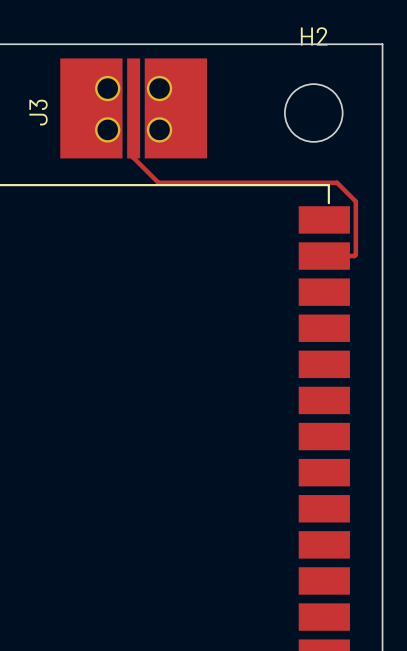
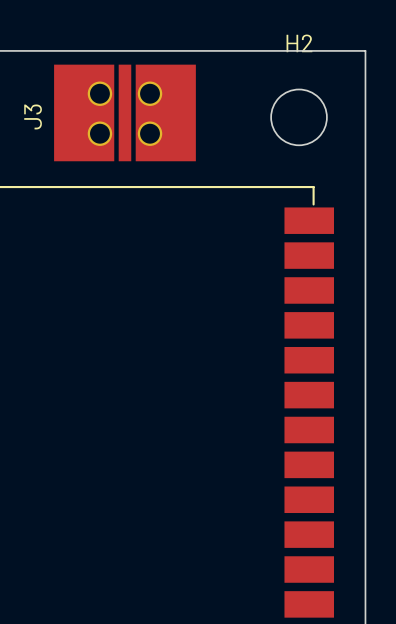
track: (133, 108) (133, 157) (158, 182) (337, 182) (355, 201) (355, 254) (324, 256) -> none

